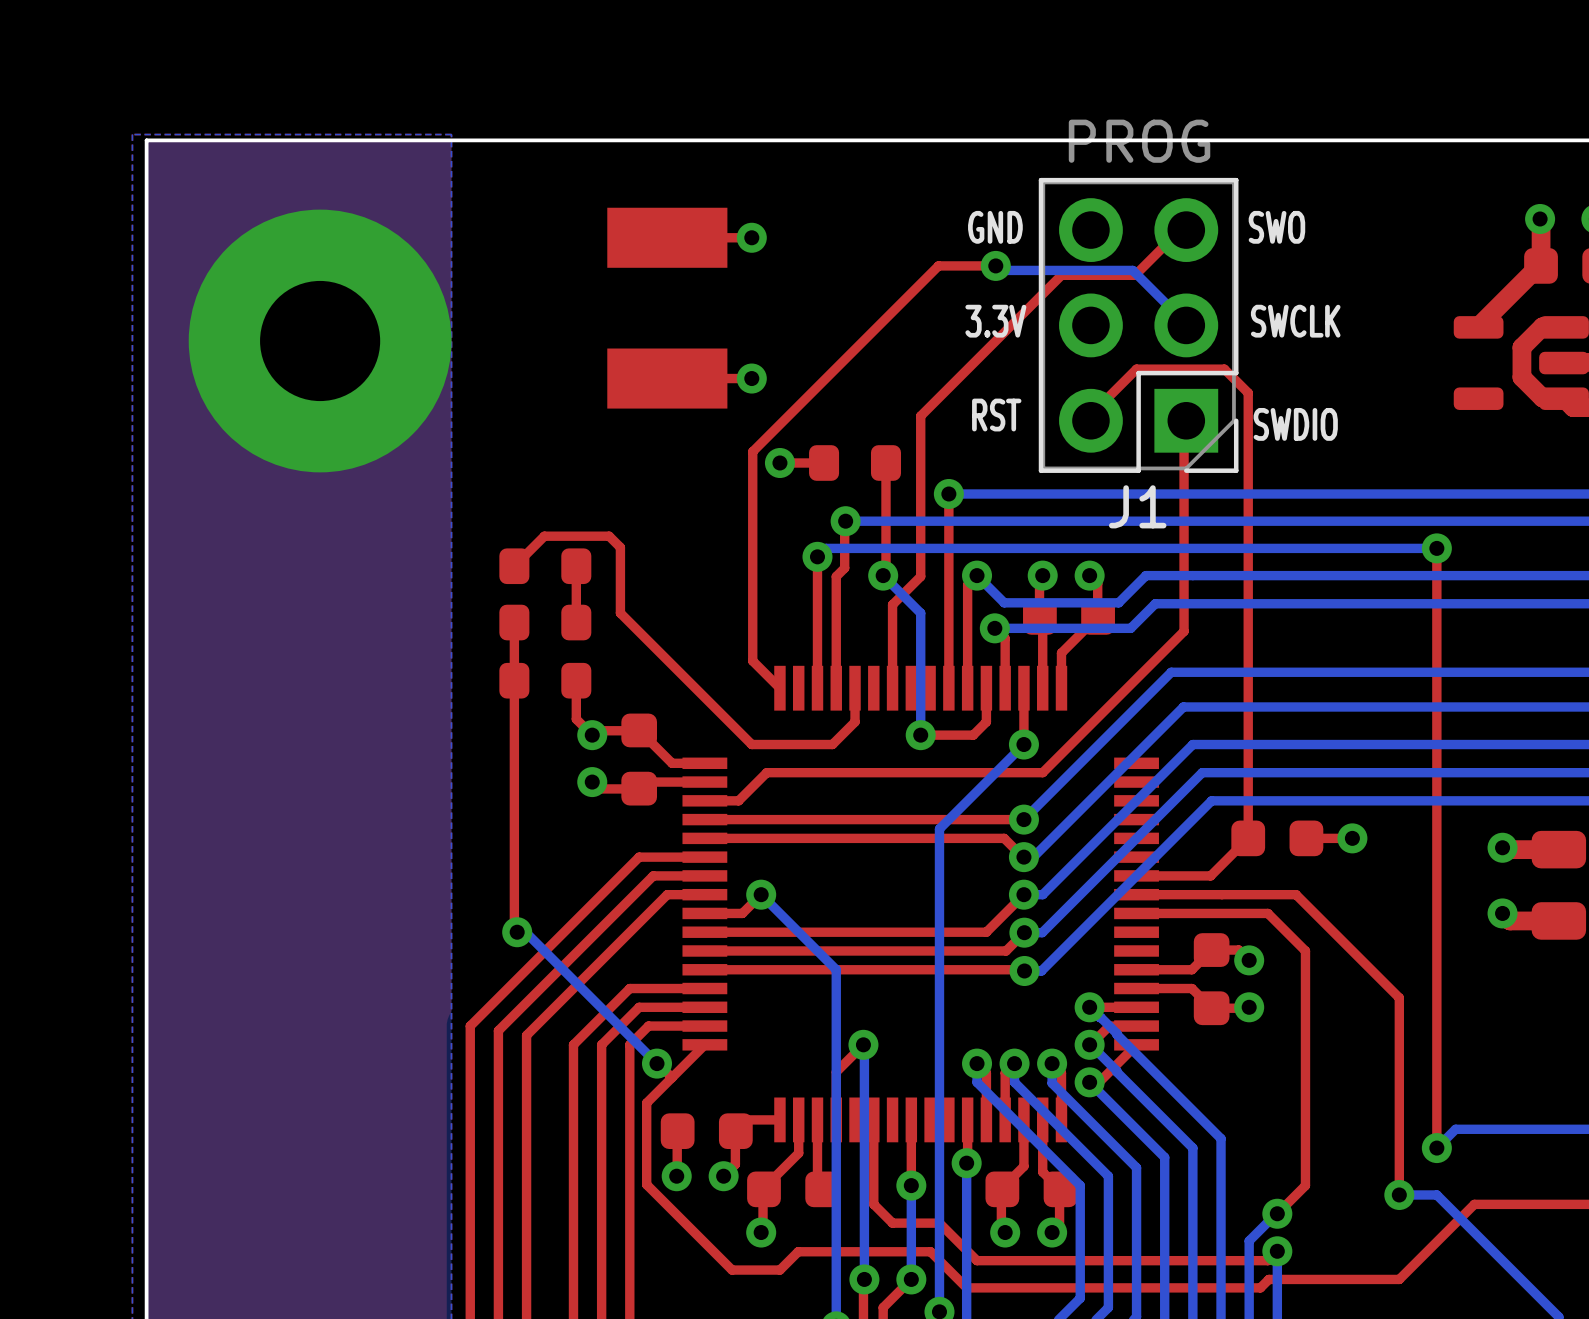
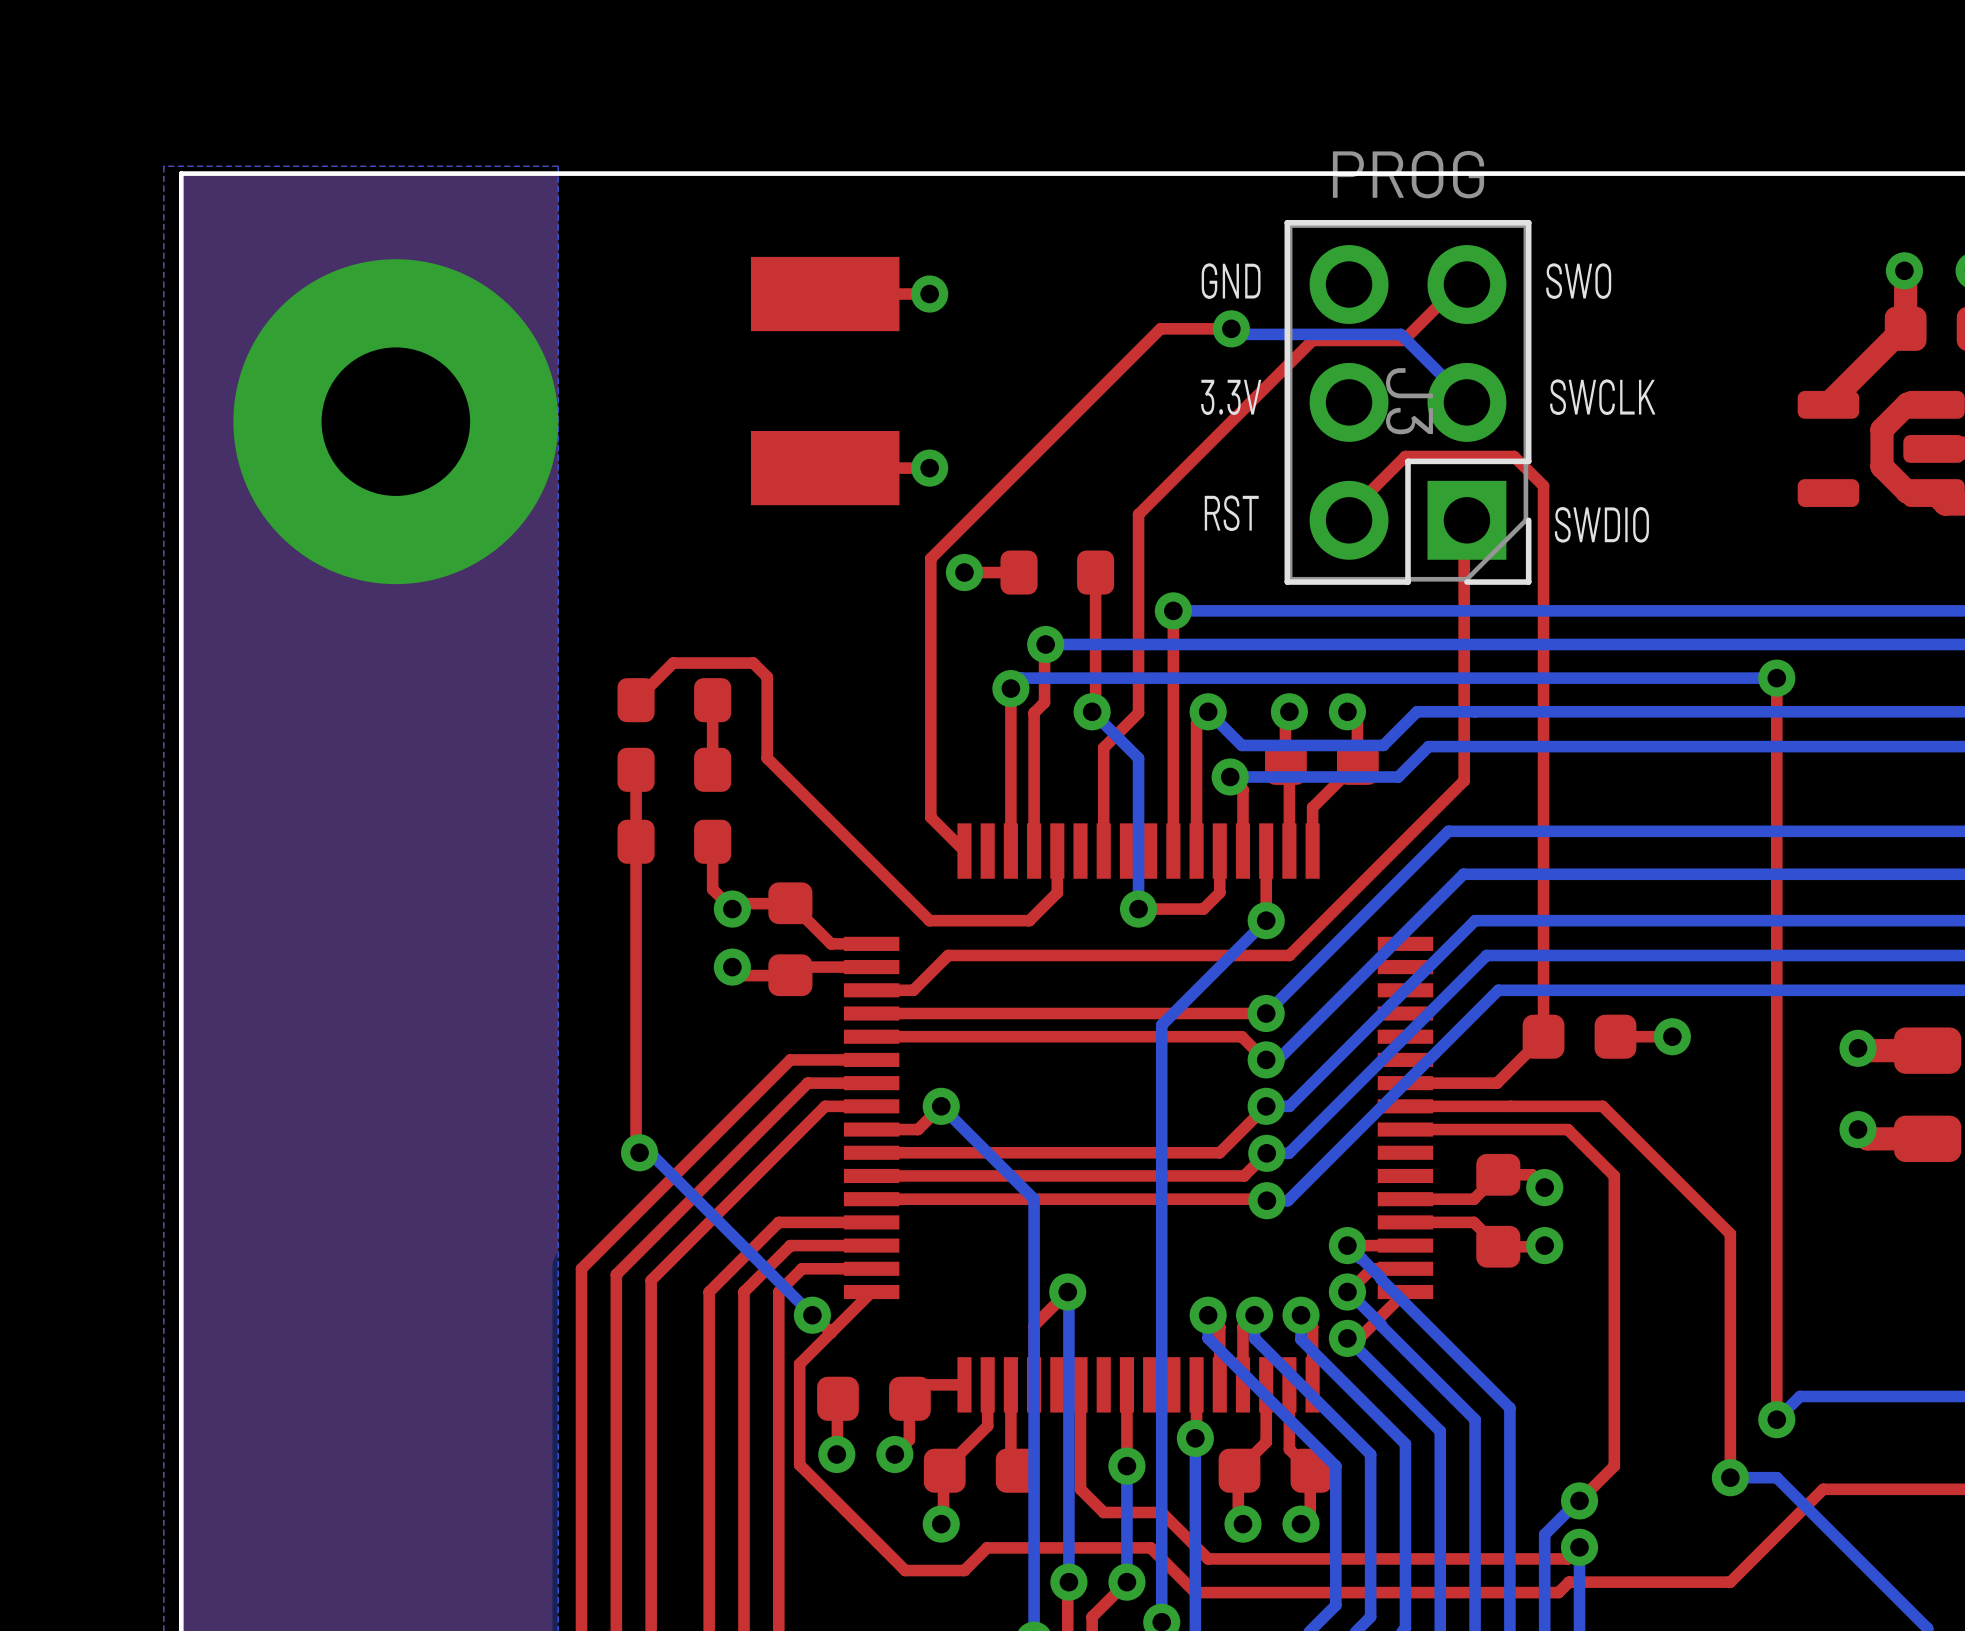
J1 name: J1 (1137, 506) -> J3 (1409, 401)

